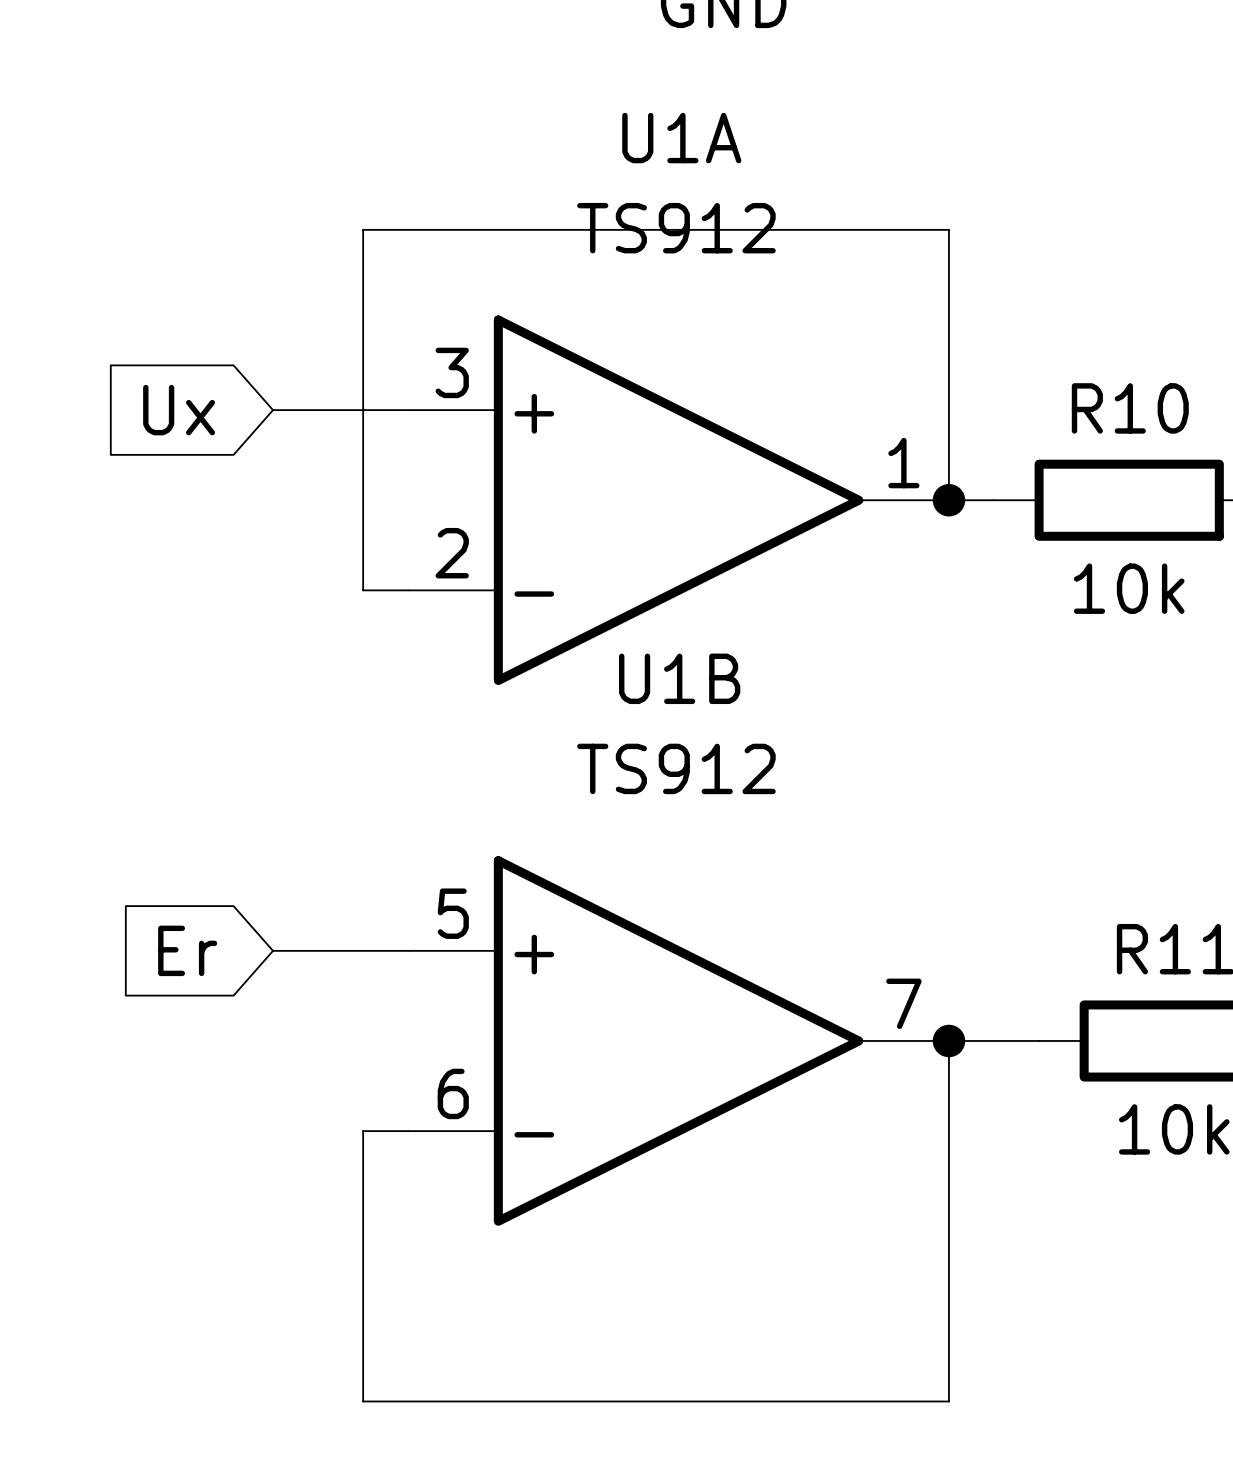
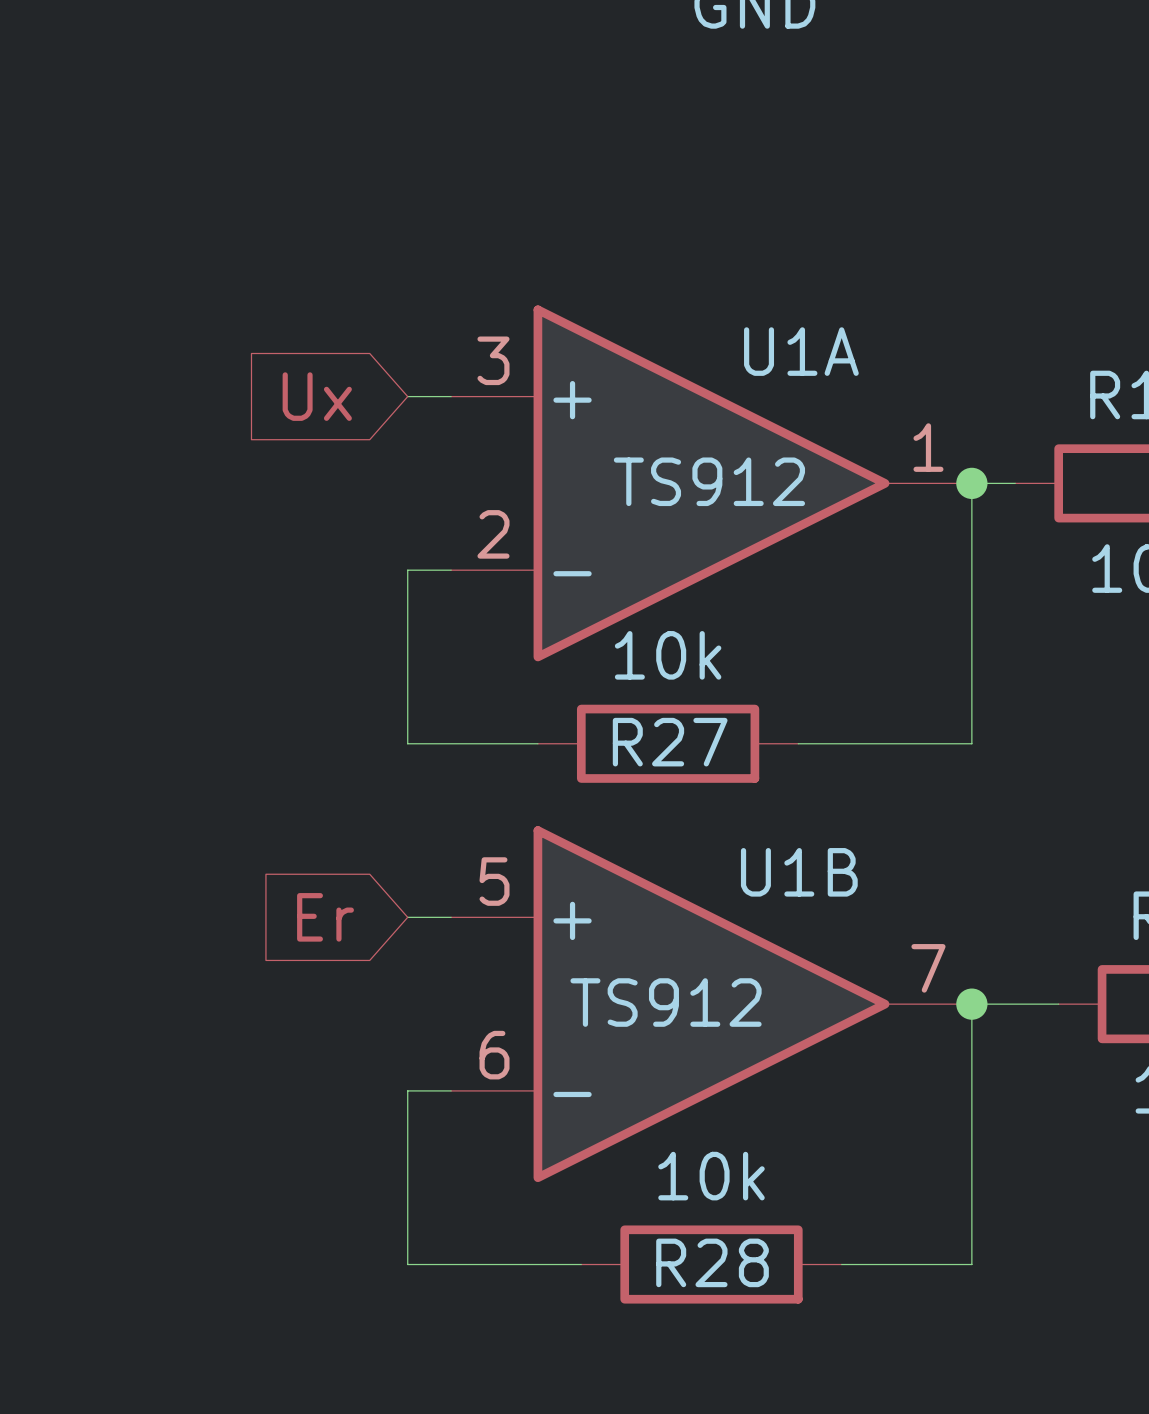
U1A name position: U1A (681, 138) -> U1A (801, 351)
U1A value position: TS912 (676, 228) -> TS912 (709, 481)
global label position: Ux (179, 410) -> Ux (317, 396)
wire: (273, 410) (363, 410) -> none
wire: (948, 500) (948, 229) (363, 229) (363, 590) -> (971, 483) (971, 743) (798, 743)
wire: none -> (407, 570) (407, 743) (537, 743)
U1B name position: U1B (679, 678) -> U1B (799, 872)
U1B value position: TS912 (676, 768) -> TS912 (666, 1002)
R27: none -> 10k (668, 743)
global label position: Er (187, 950) -> Er (325, 917)
wire: (273, 950) (363, 950) -> none
wire: (363, 1311) (363, 1401) (948, 1401) (948, 1311) -> (407, 1264) (581, 1264)
R28: none -> 10k (711, 1264)
wire: none -> (841, 1264) (971, 1264)

